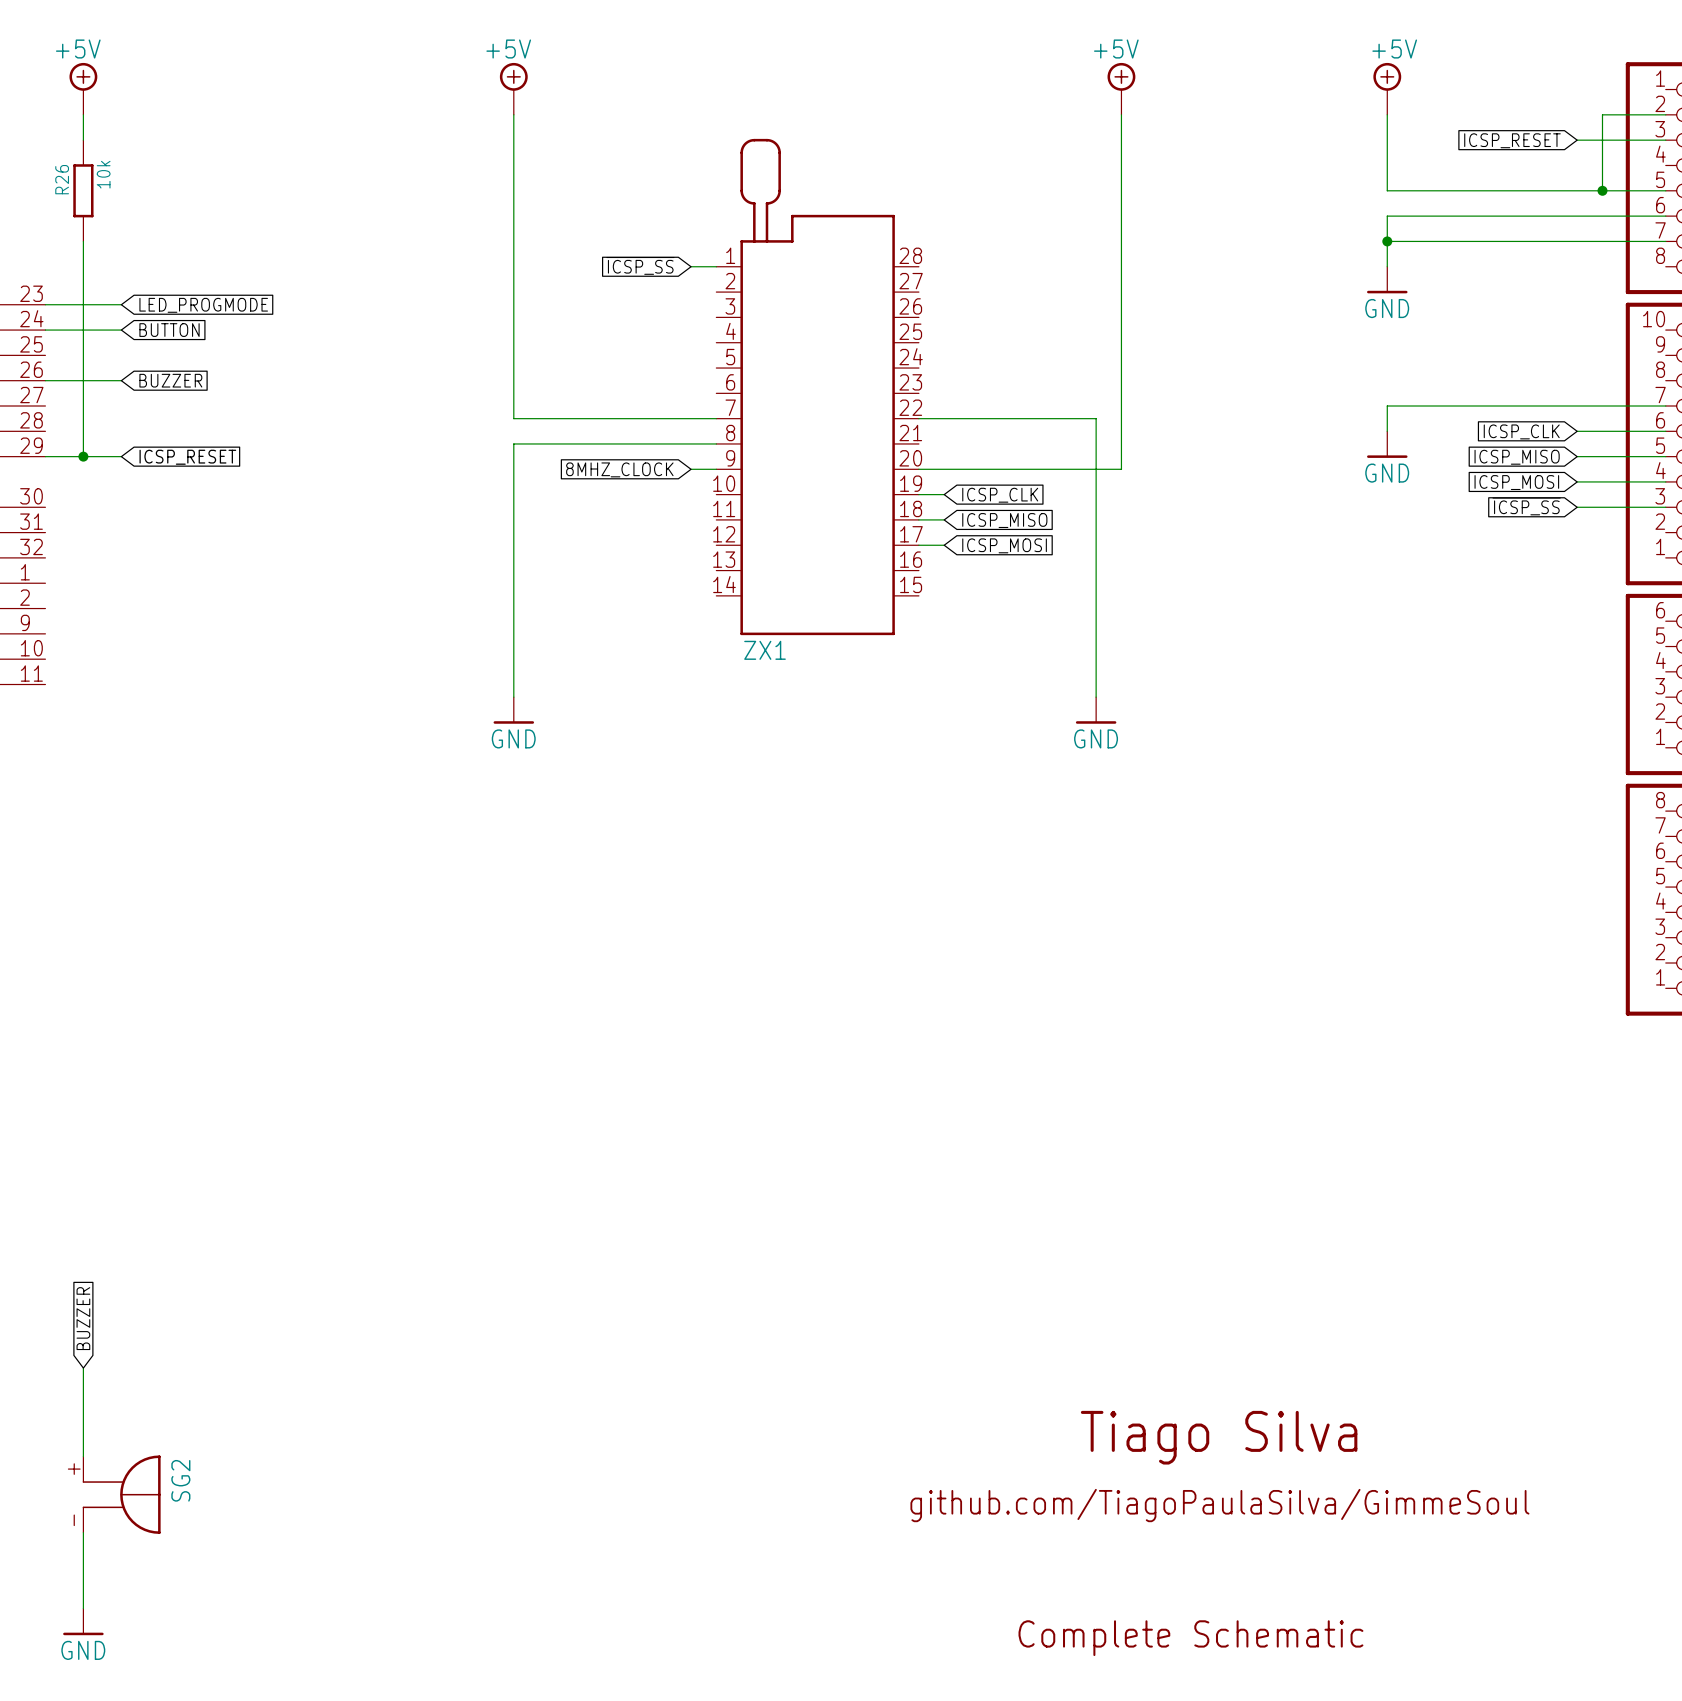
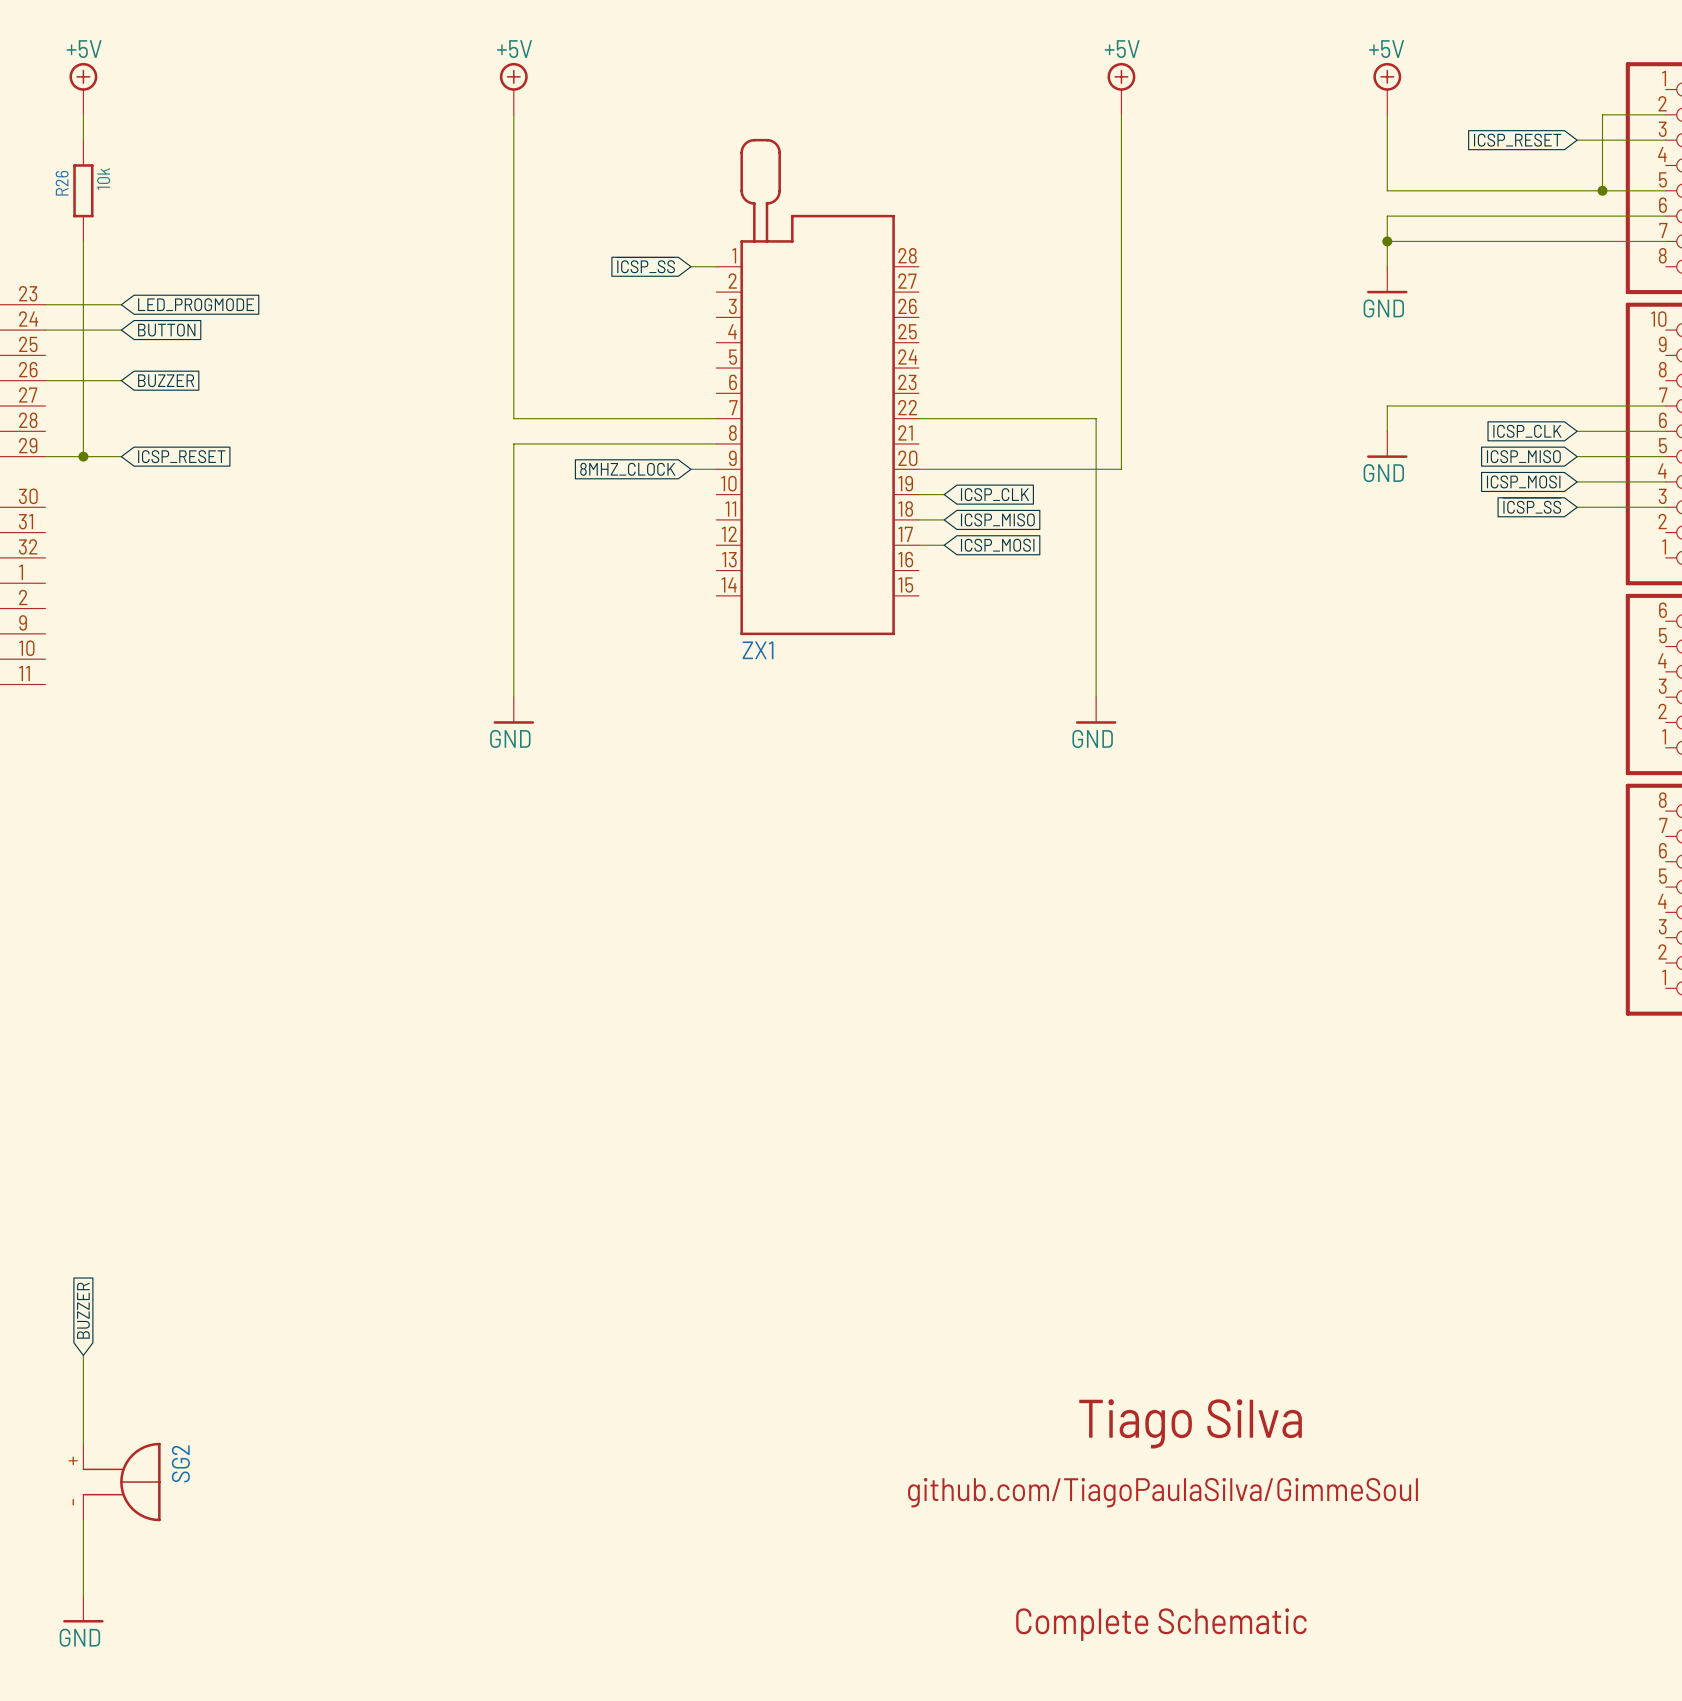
global label position: BUZZER (83, 1318) -> BUZZER (83, 1310)
text position: Tiago Silva (1219, 1437) -> Tiago Silva (1190, 1423)
SG2 position: (121, 1494) -> (121, 1482)
text position: github.com/TiagoPaulaSilva/GimmeSoul (1219, 1505) -> github.com/TiagoPaulaSilva/GimmeSoul (1162, 1492)
power symbol position: GND (83, 1621) -> GND (83, 1609)
text position: Complete Schematic (1190, 1638) -> Complete Schematic (1161, 1624)

